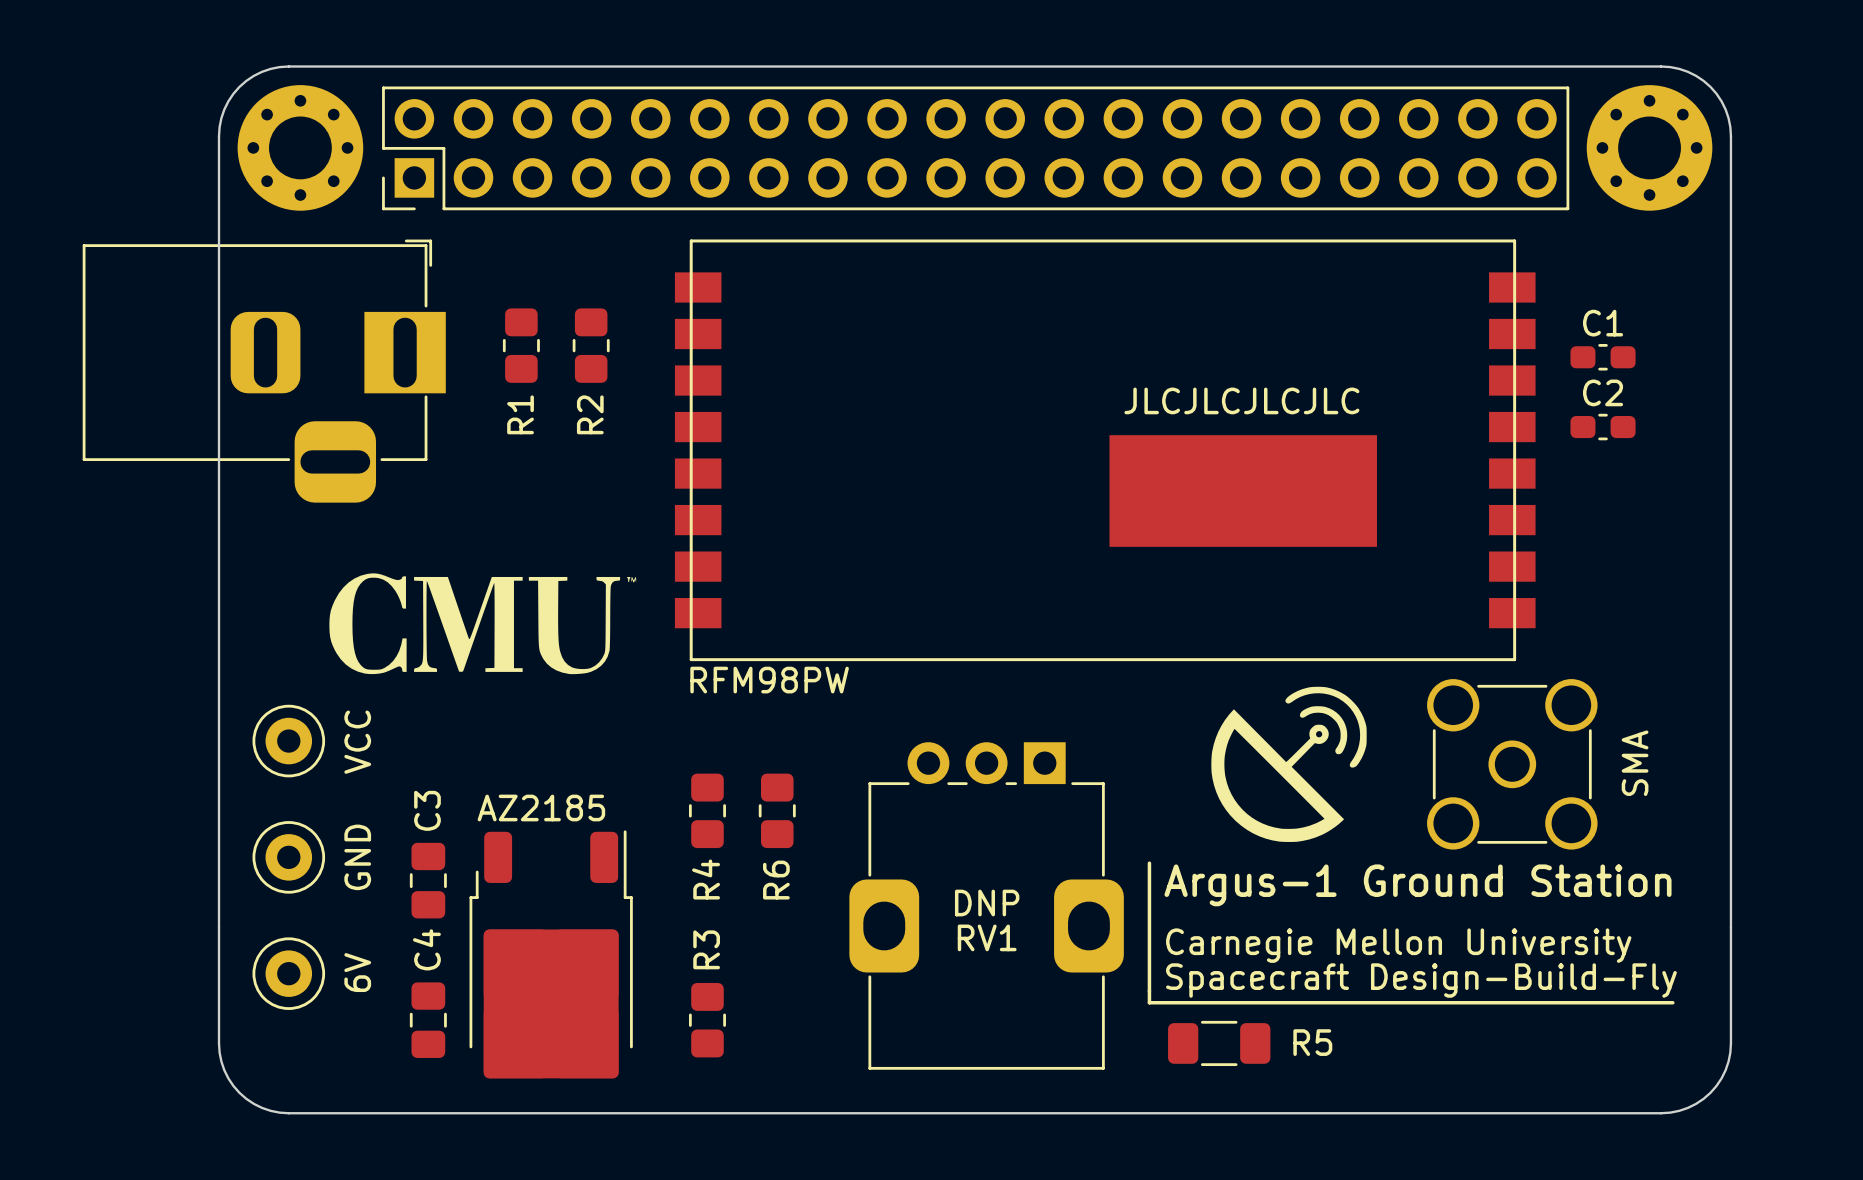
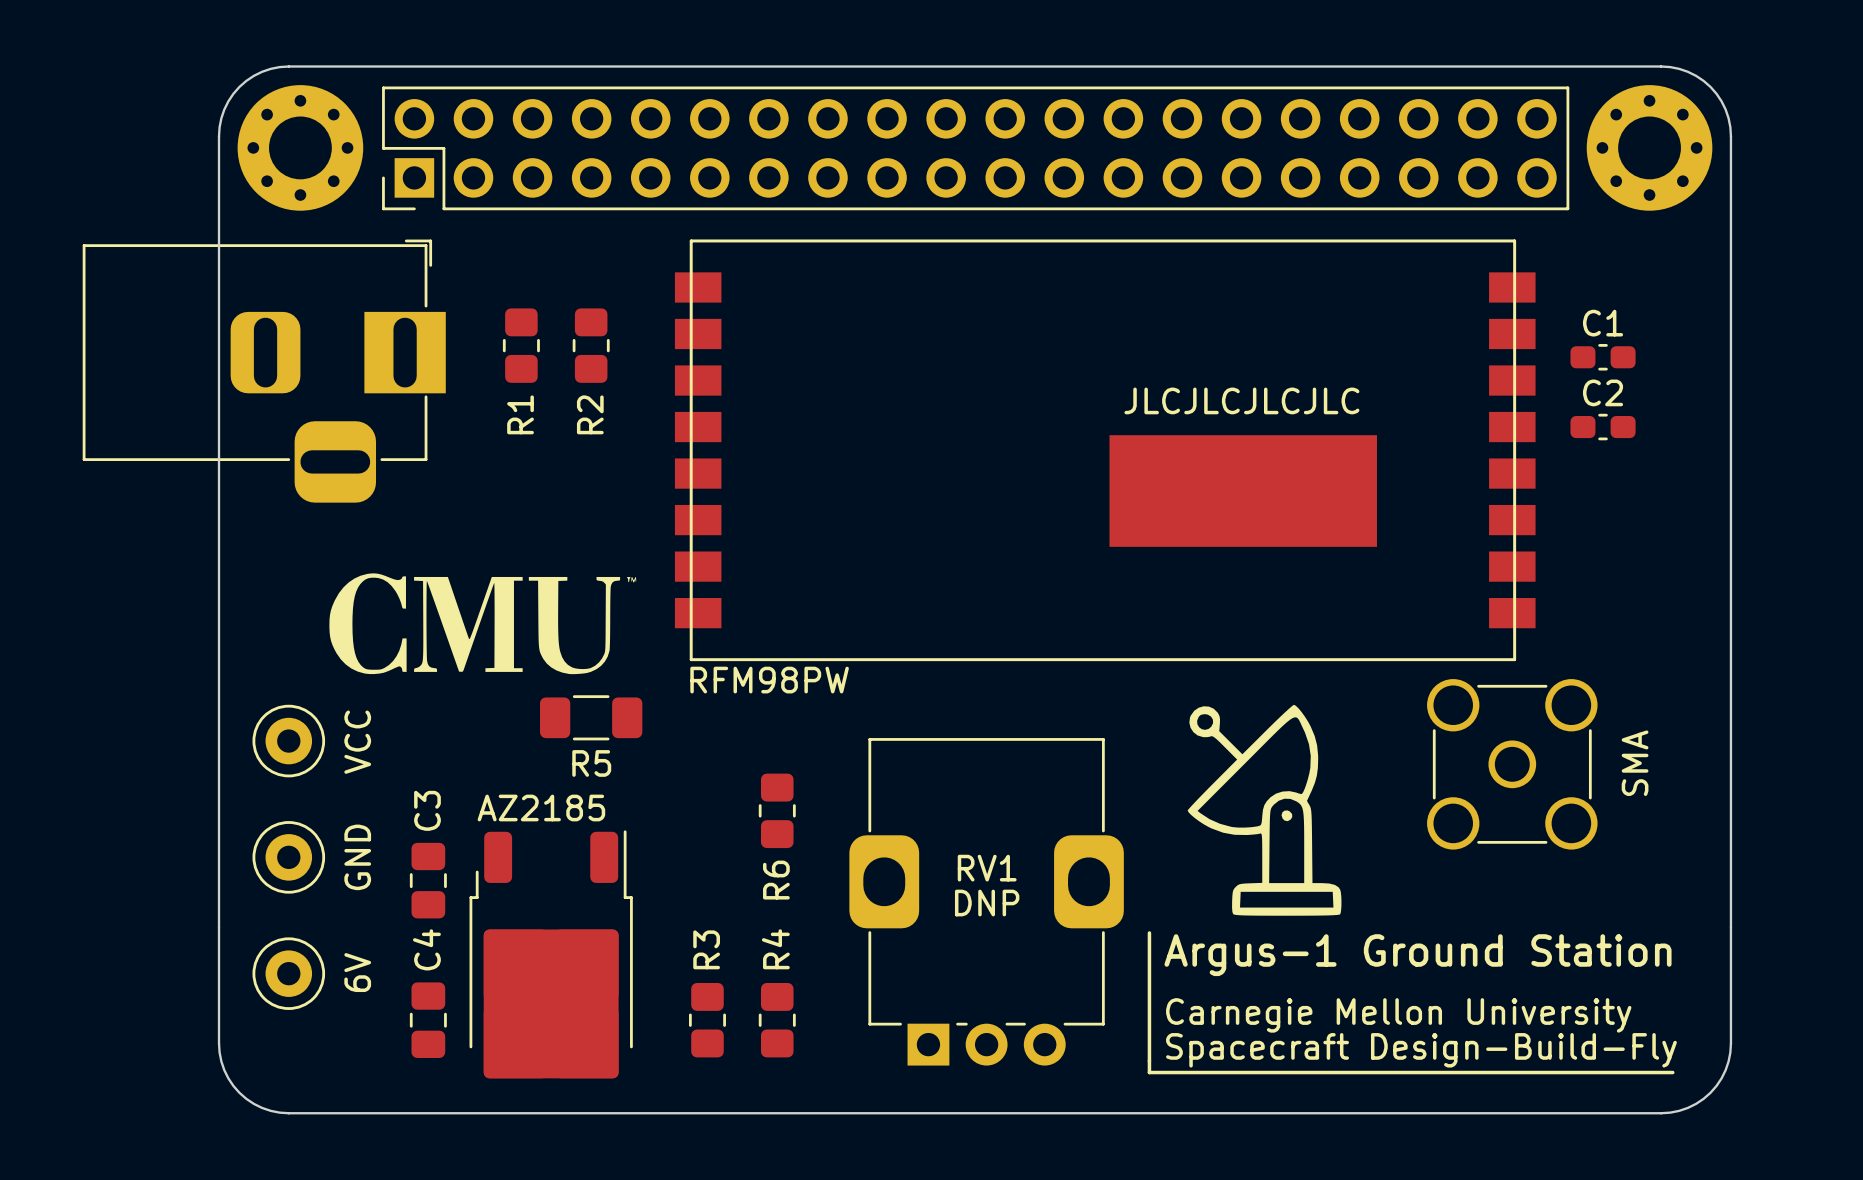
drawing: [1211, 686, 1367, 842] -> none
drawing: none -> [1187, 704, 1342, 916]
R4 position: (707, 810) -> (777, 1020)
line: (1149, 863) (1149, 932) -> none
R4 name position: R4 (706, 879) -> R4 (775, 949)
text position: Argus-1 Ground Station (1418, 885) -> Argus-1 Ground Station (1418, 955)
RV1 rotation: 0° (986, 905) -> 180° (986, 901)
text position: Carnegie Mellon University (1398, 945) -> Carnegie Mellon University (1398, 1015)
text position: Spacecraft Design-Build-Fly (1421, 980) -> Spacecraft Design-Build-Fly (1421, 1050)
line: (1149, 1002) (1672, 1002) -> (1149, 1002) (1149, 1072) (1672, 1072)
R5 name position: R5 (1312, 1042) -> R5 (591, 763)
R5 position: (1219, 1043) -> (591, 717)

